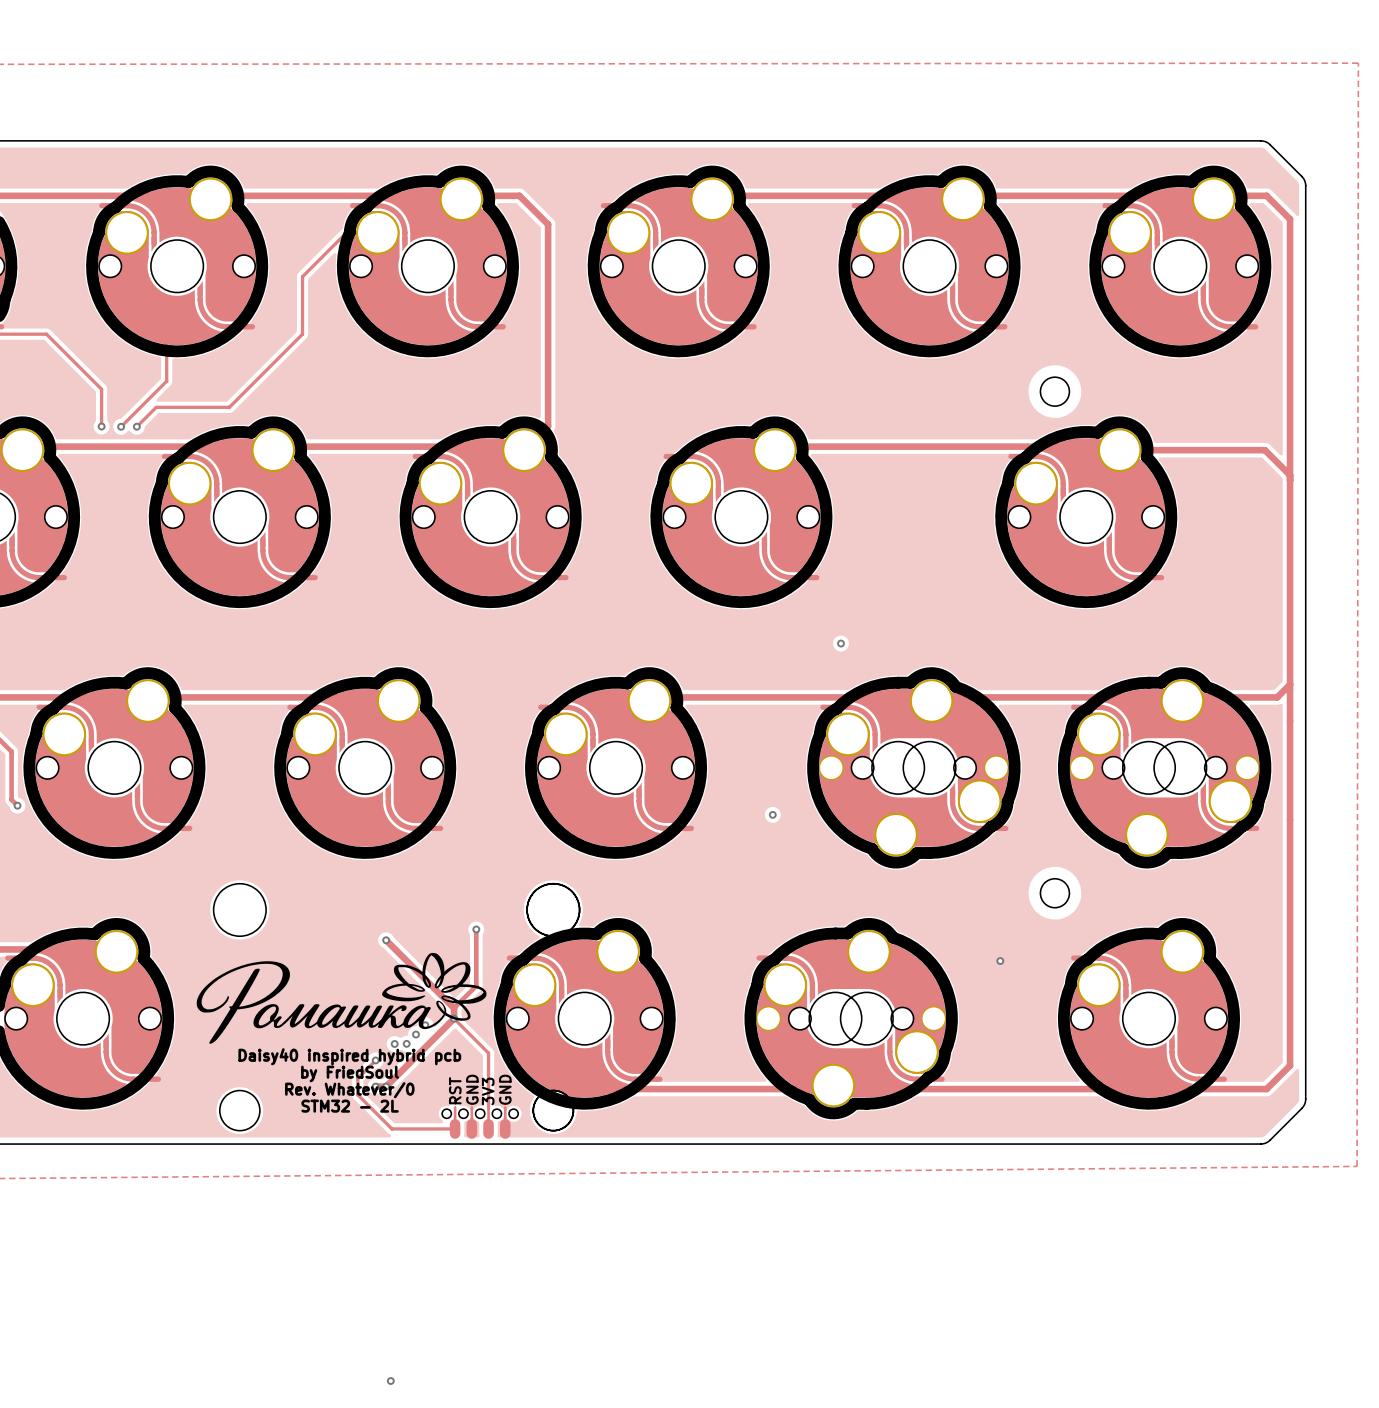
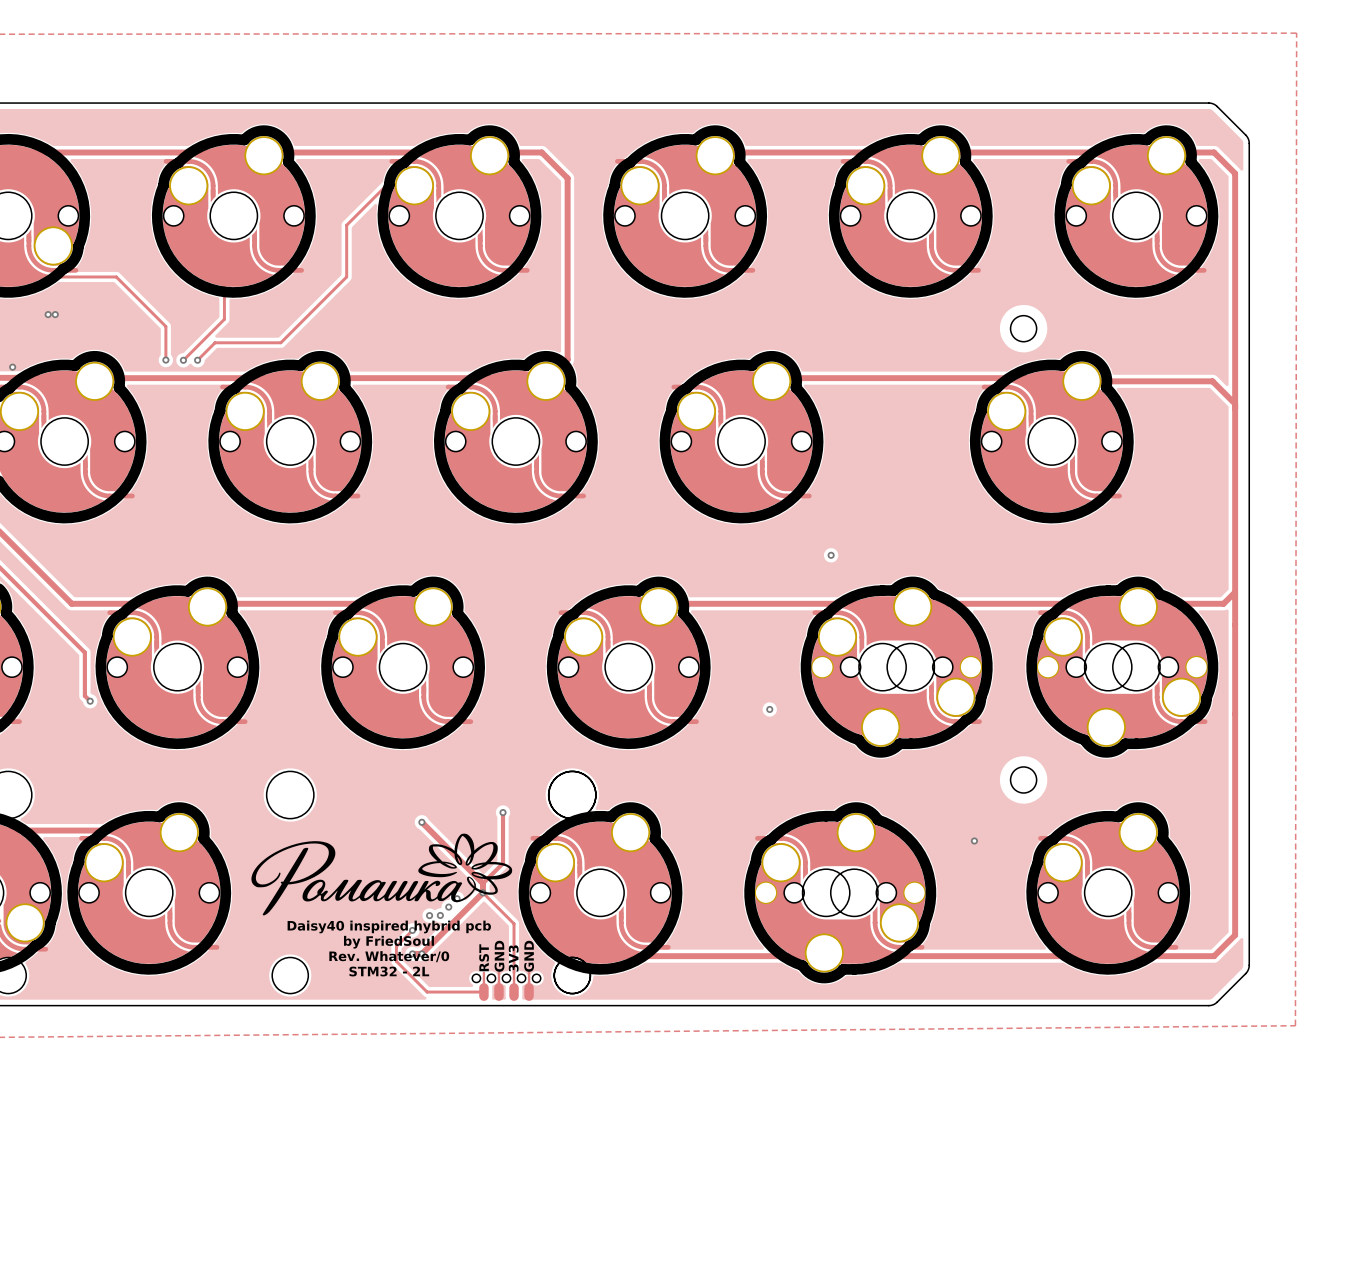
via: (390, 1381) -> none

